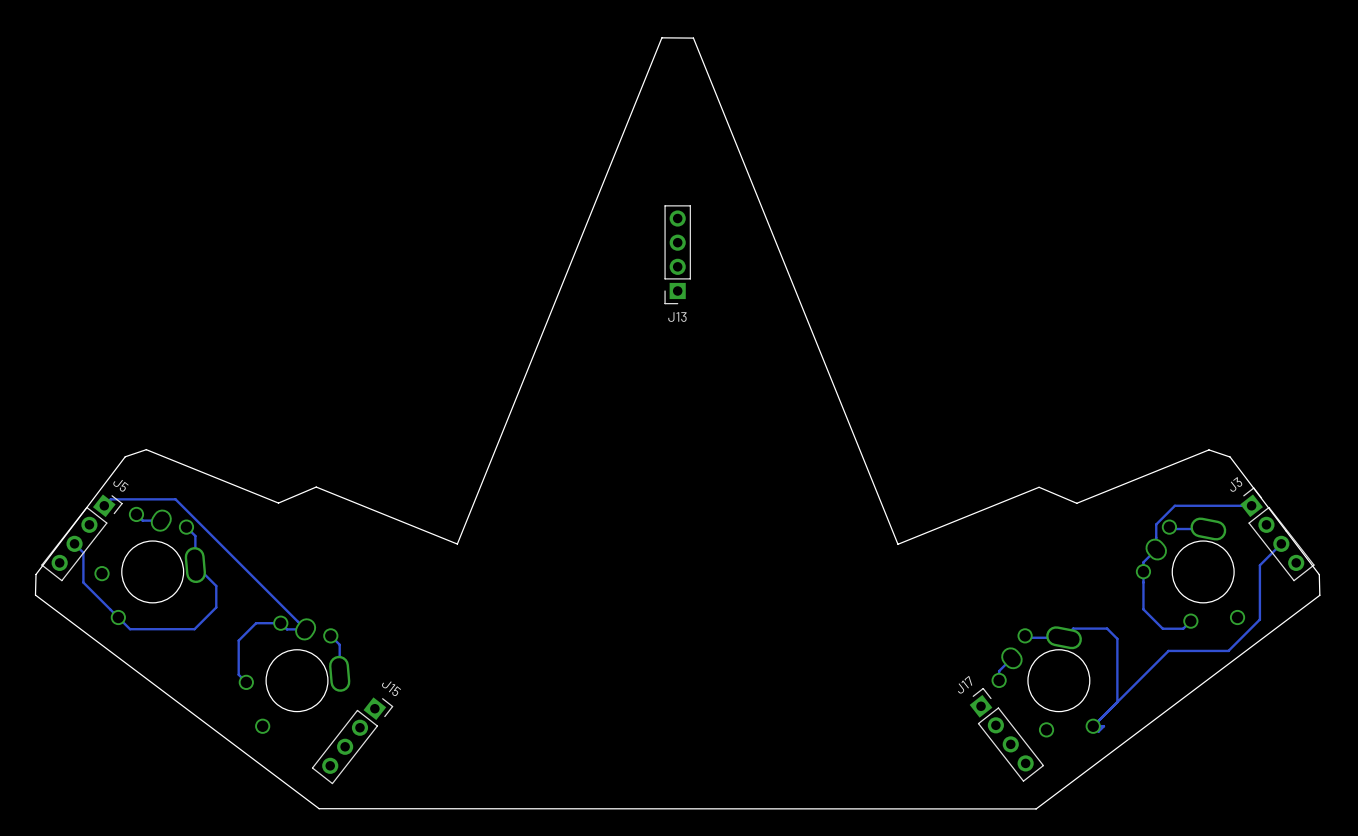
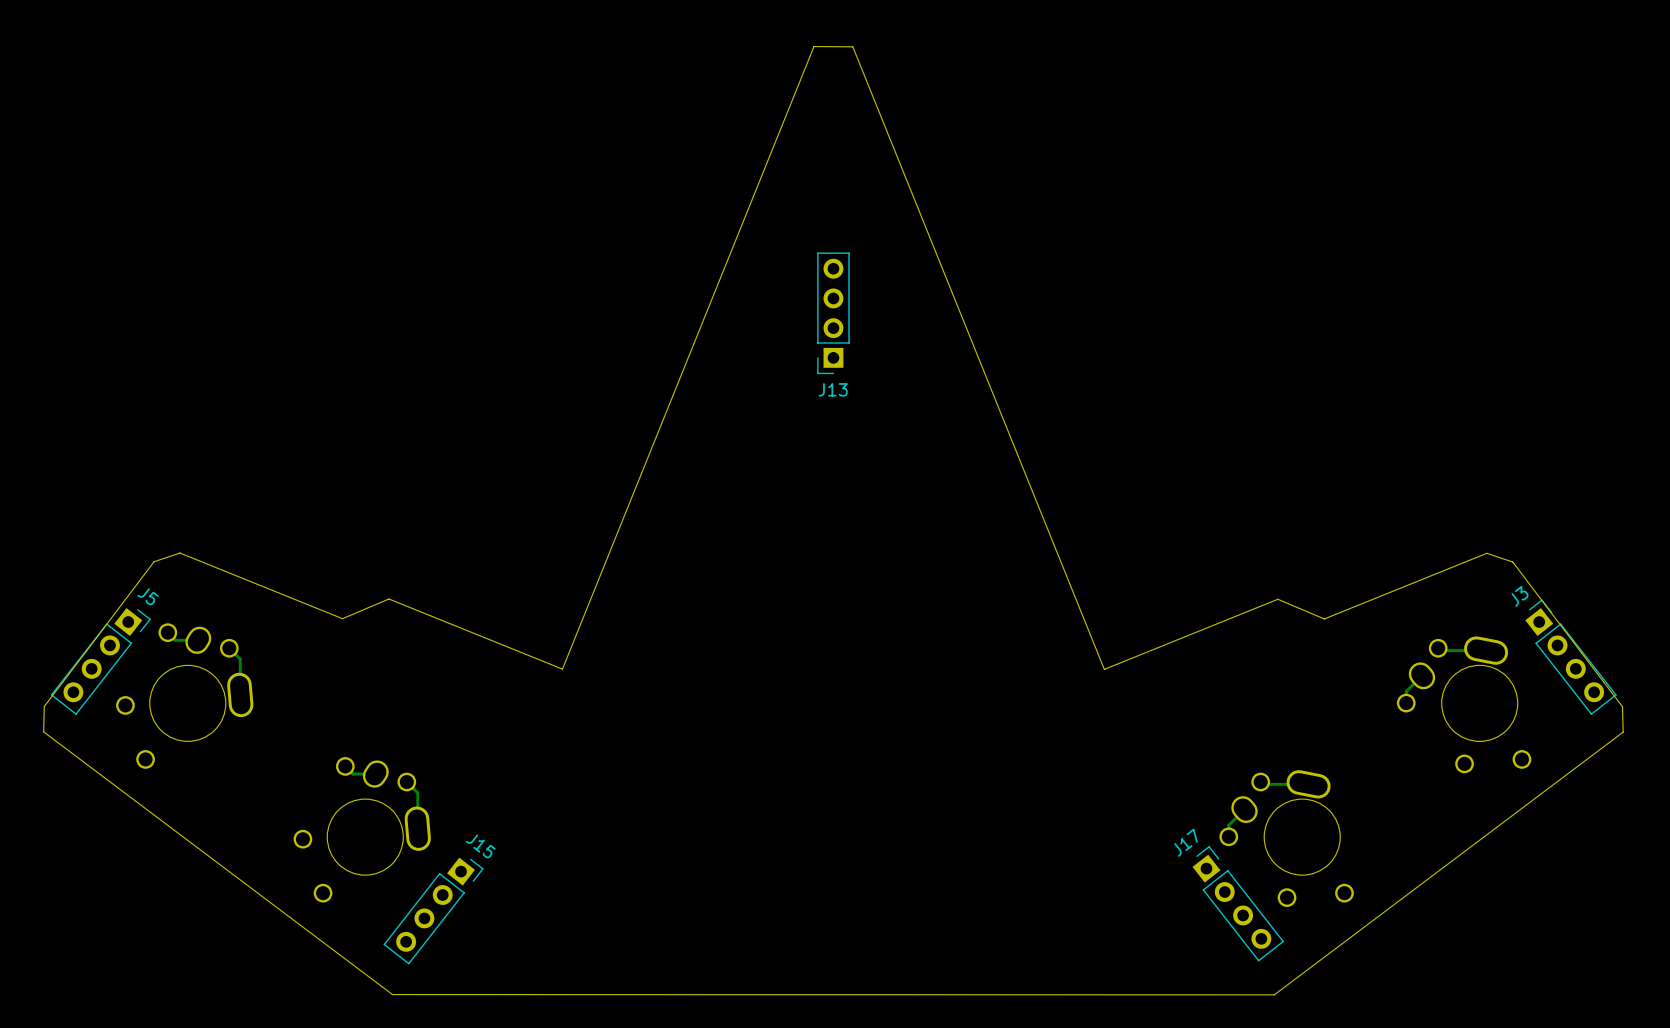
track: (104, 505) (110, 499) (175, 499) (305, 629) -> none
track: (1251, 505) (1174, 505) (1156, 524) (1156, 549) -> none
track: (74, 543) (83, 552) (83, 582) (130, 629) (194, 629) (216, 607) (216, 585) (195, 565) -> none
track: (1281, 543) (1259, 565) (1259, 619) (1228, 650) (1168, 650) (1093, 726) -> none
track: (1143, 571) (1143, 609) (1162, 628) (1183, 628) (1190, 621) -> none
track: (280, 623) (256, 623) (238, 640) (238, 674) (246, 682) -> none
track: (1064, 637) (1073, 628) (1107, 628) (1117, 638) (1117, 702) -> none
track: (1093, 726) (1103, 726) (1098, 731) (1093, 726) -> none

